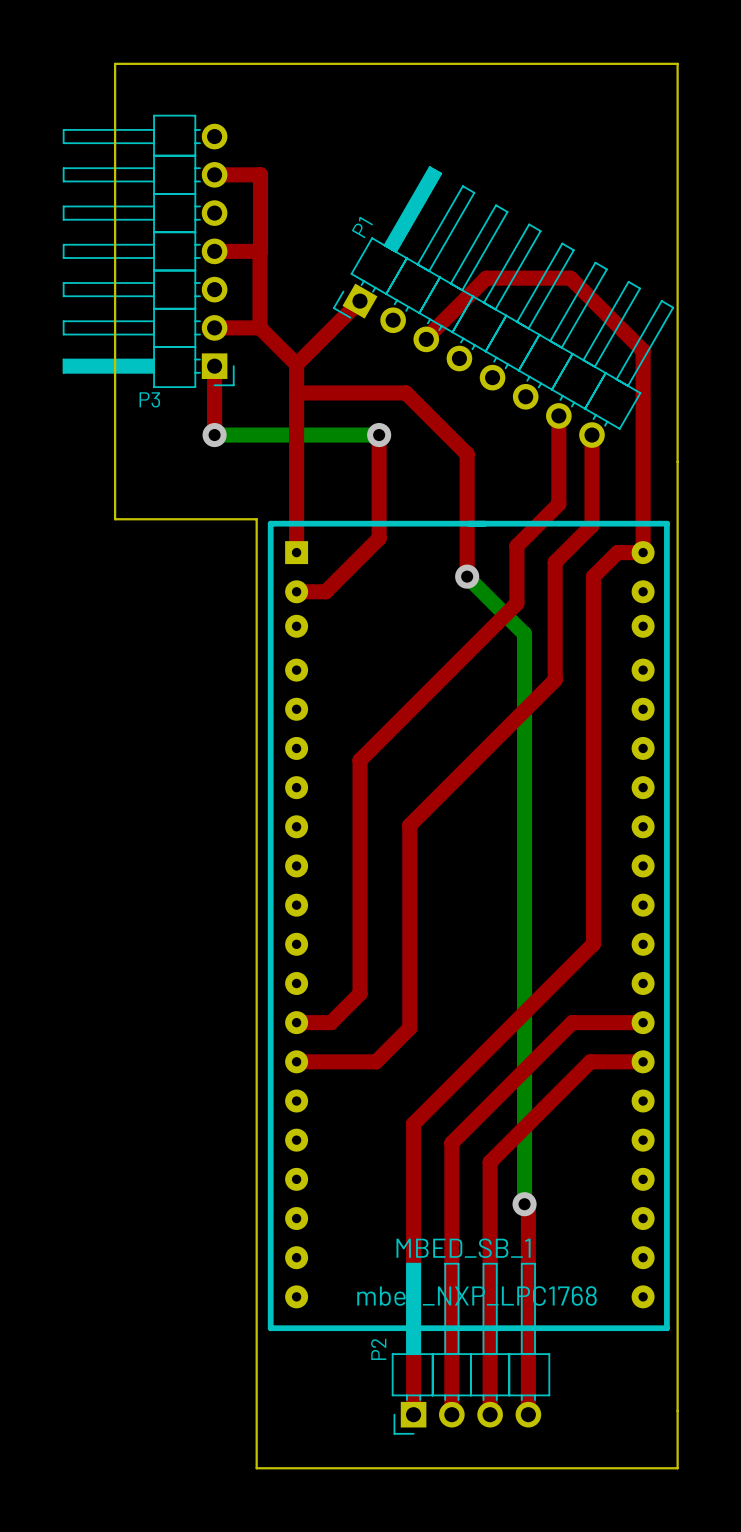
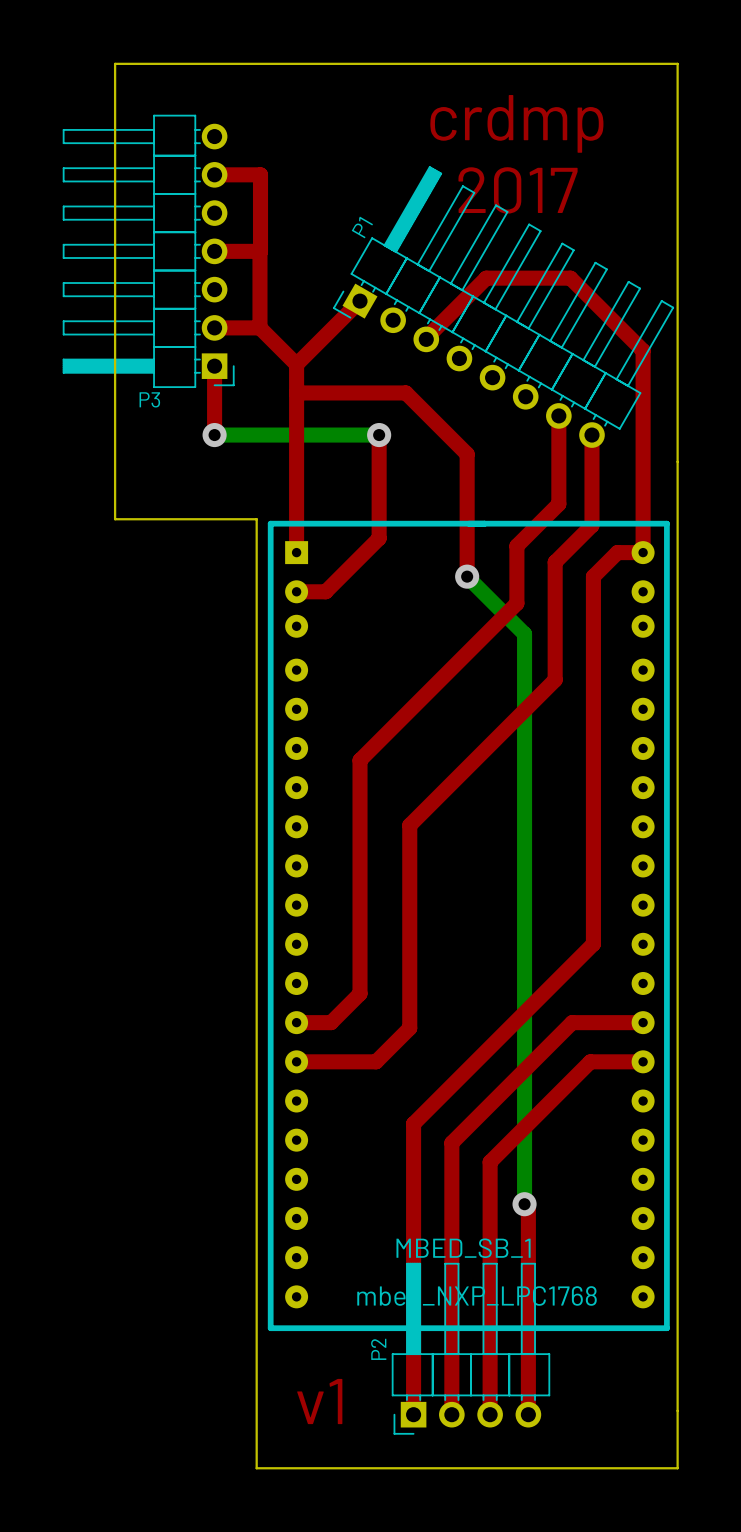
text: none -> crdmp (516, 123)
text: none -> 2017 (518, 190)
text: none -> v1 (319, 1401)

